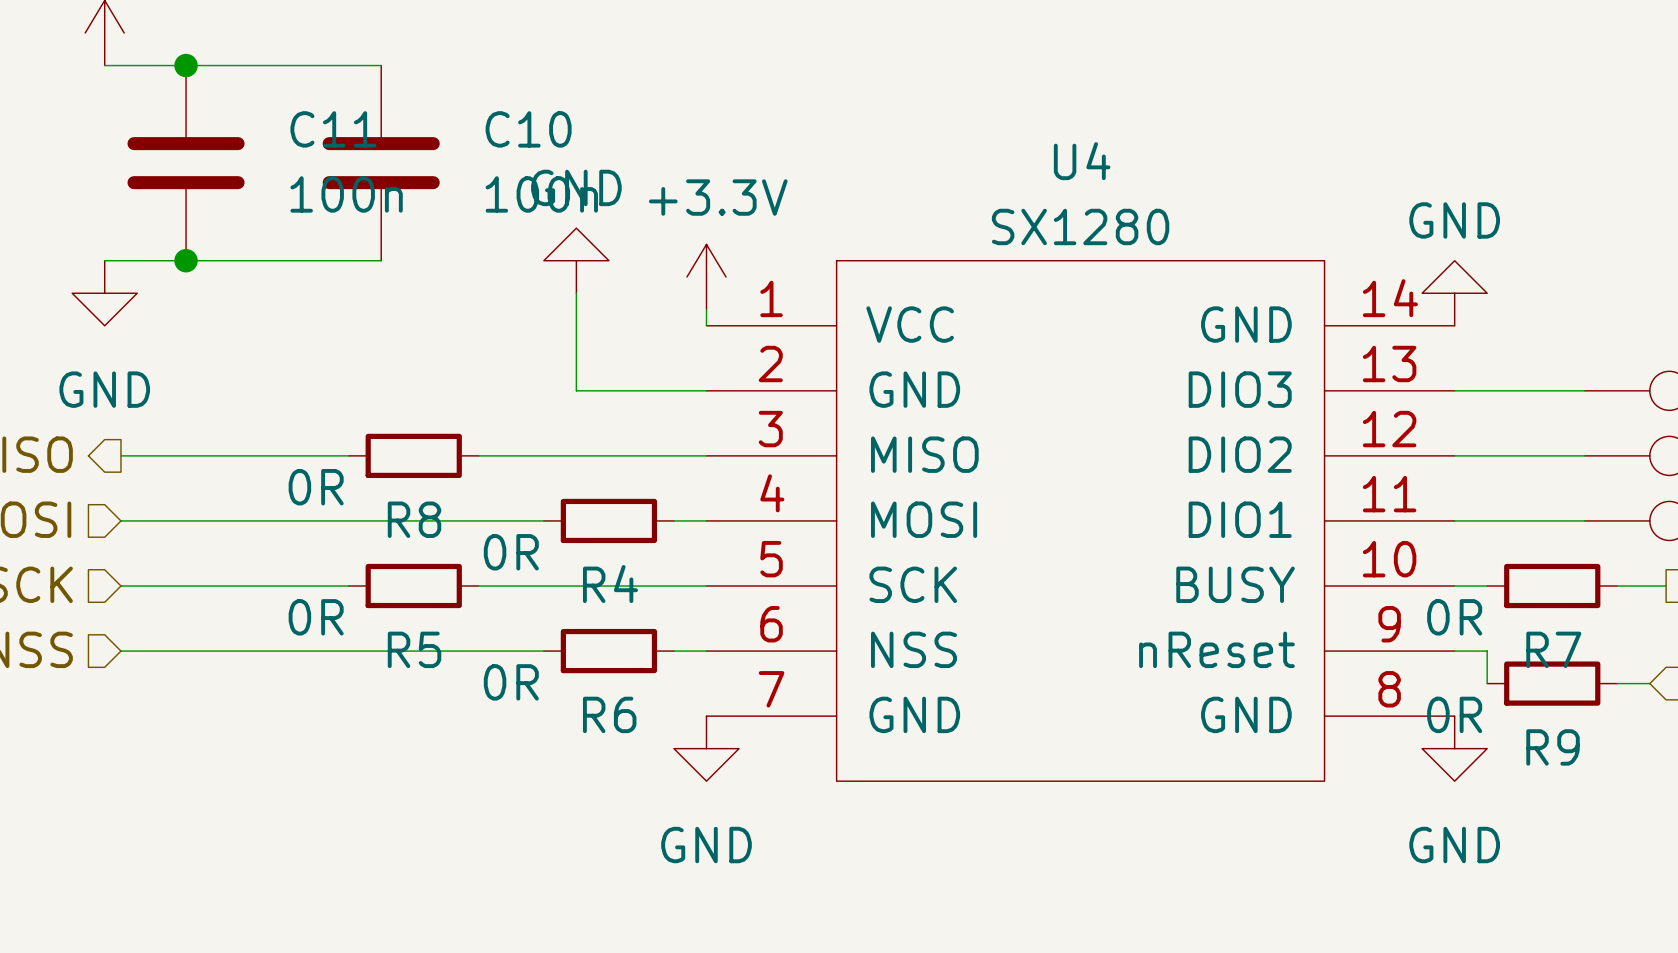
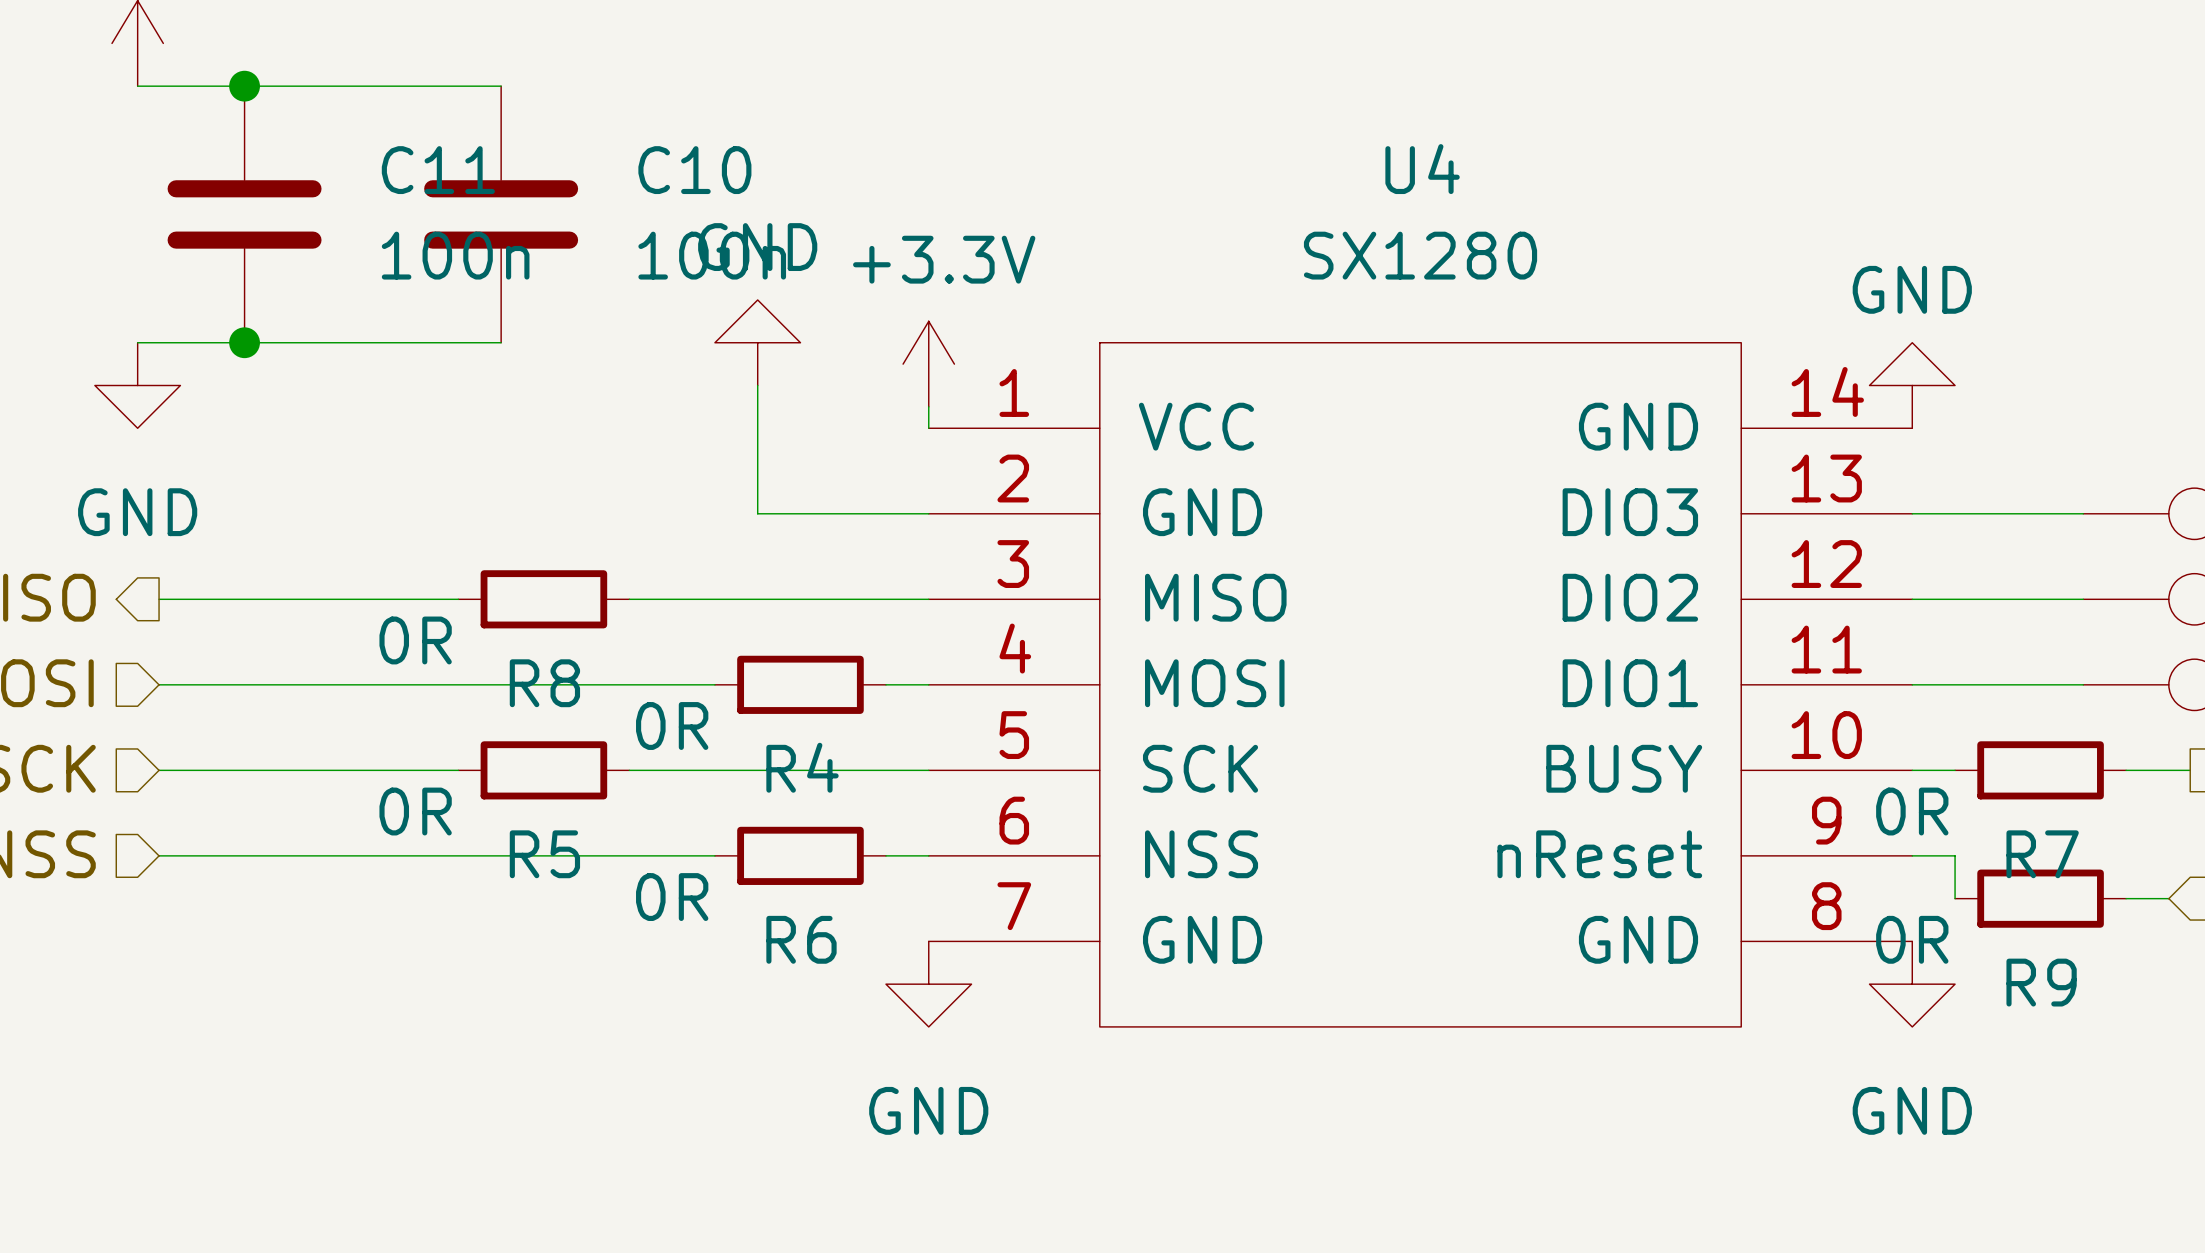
U4 name position: U4 (1082, 161) -> U4 (1422, 169)
U4 value position: SX1280 (1080, 226) -> SX1280 (1420, 255)

